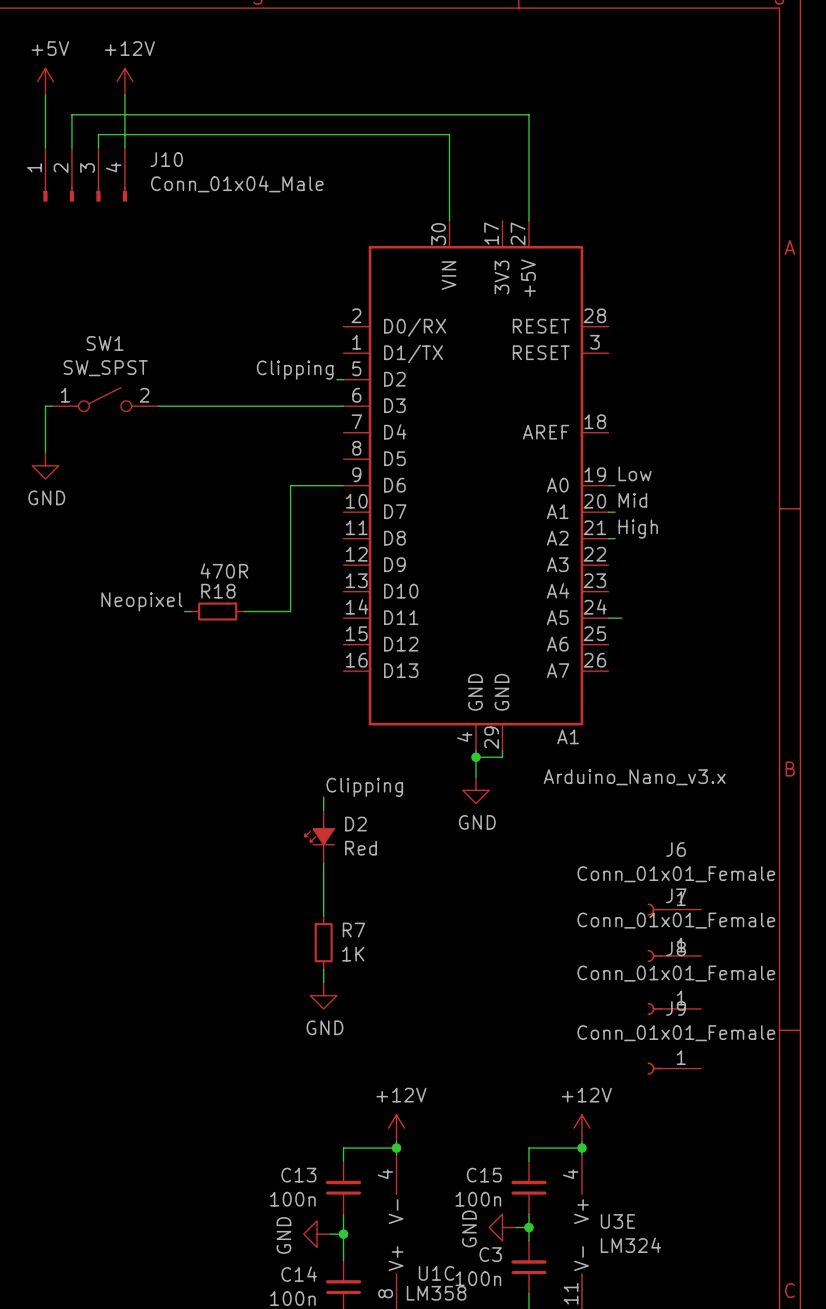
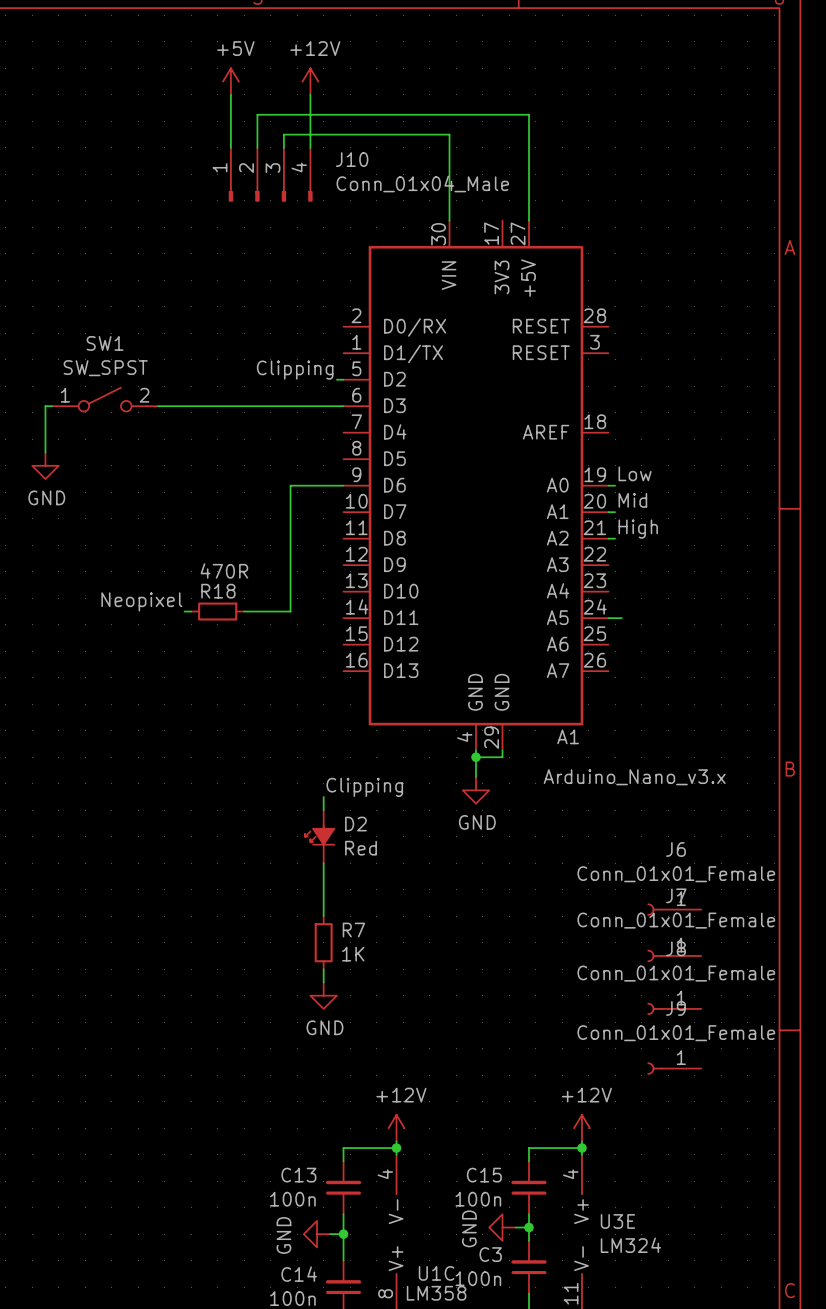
power symbol position: +5V (45, 81) -> +5V (230, 81)
power symbol: +12V (124, 81) -> none
power symbol: none -> +12V (310, 81)
wire: (45, 94) (45, 147) -> none
wire: (124, 94) (124, 147) -> (230, 94) (230, 147)
wire: none -> (310, 94) (310, 147)
wire: (257, 114) (71, 114) (71, 147) -> (257, 114) (257, 147)
wire: (283, 134) (98, 134) (98, 147) -> (283, 134) (283, 147)
J10 position: (85, 174) -> (270, 174)

